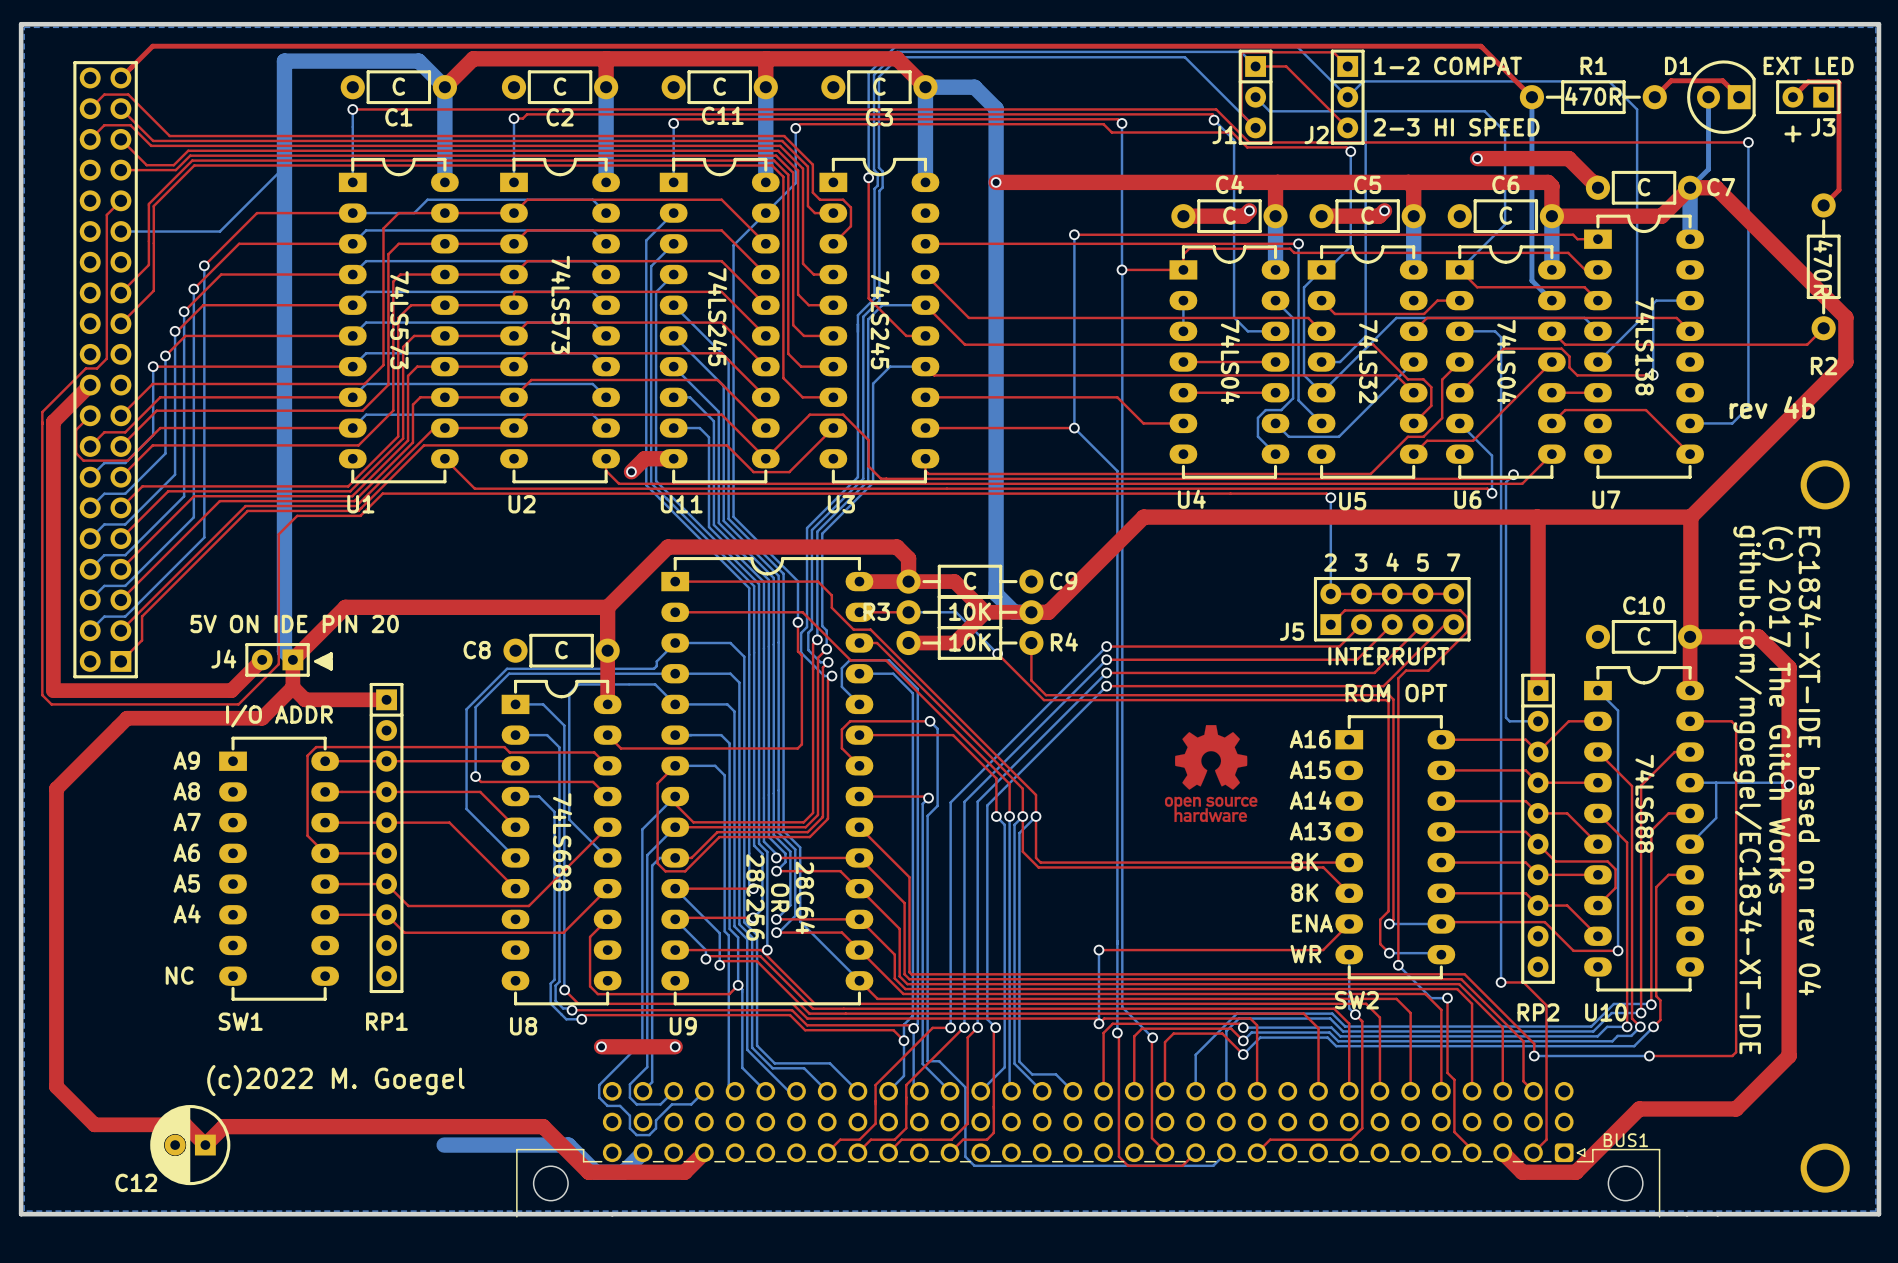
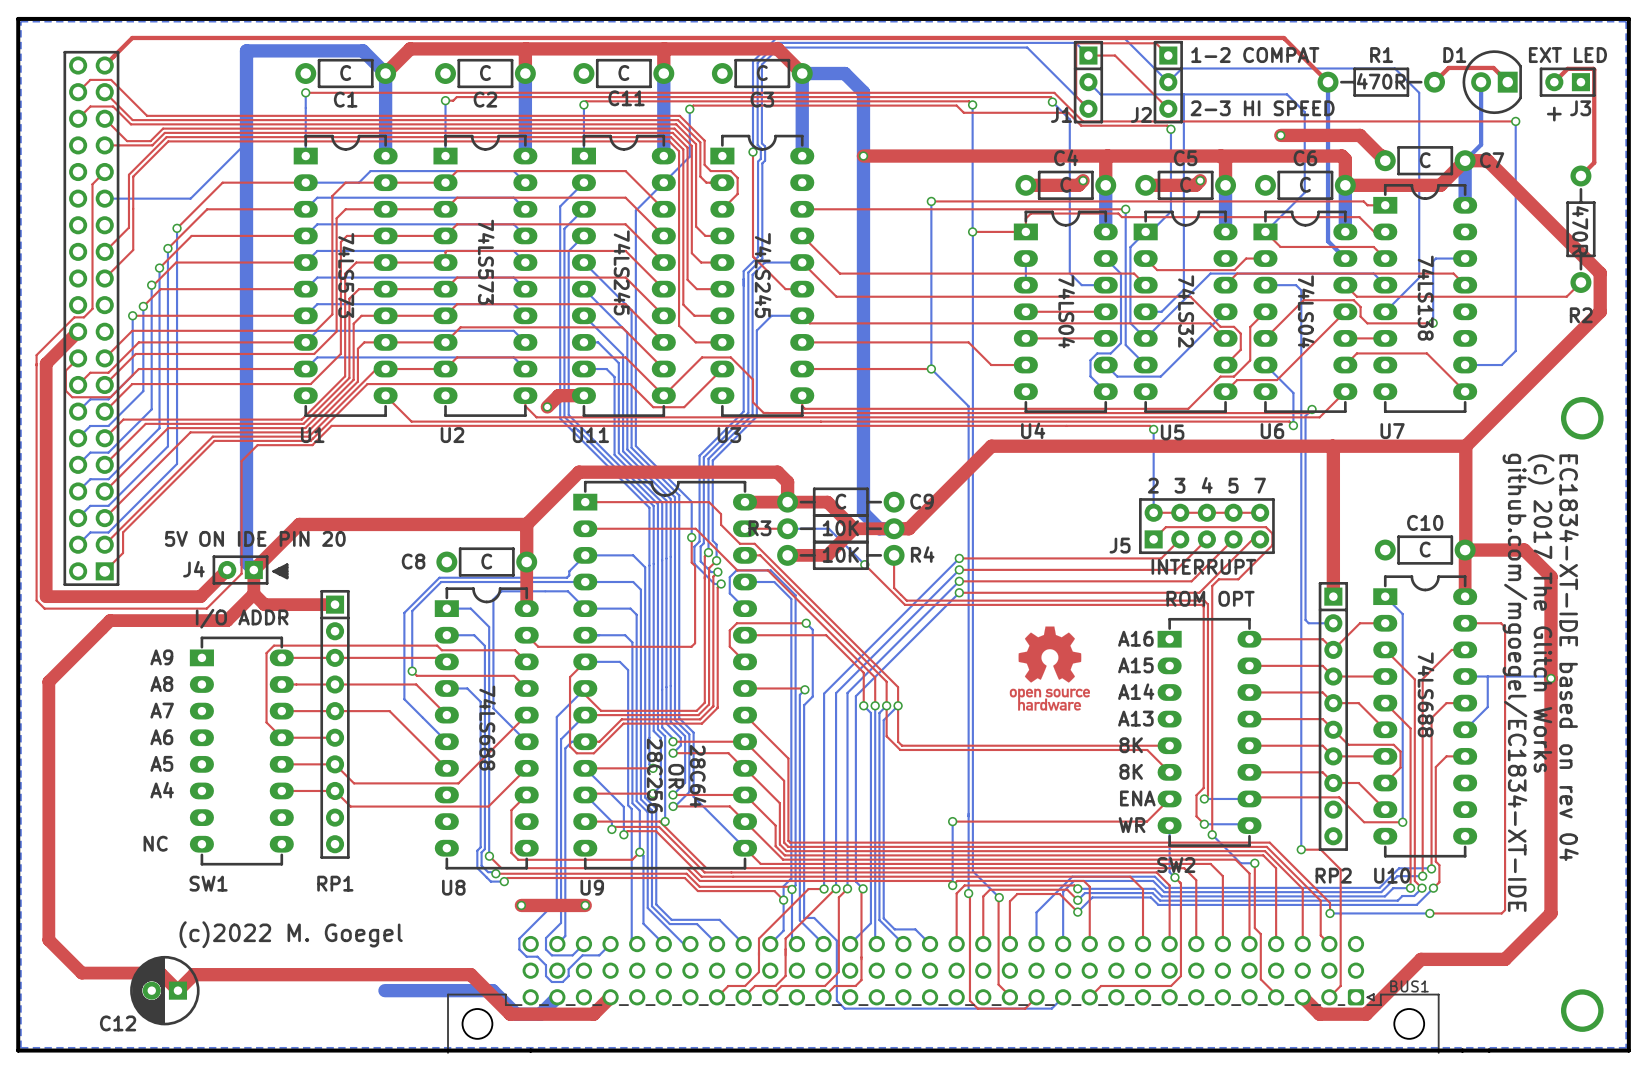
text: rev 4b (1772, 407) -> none

